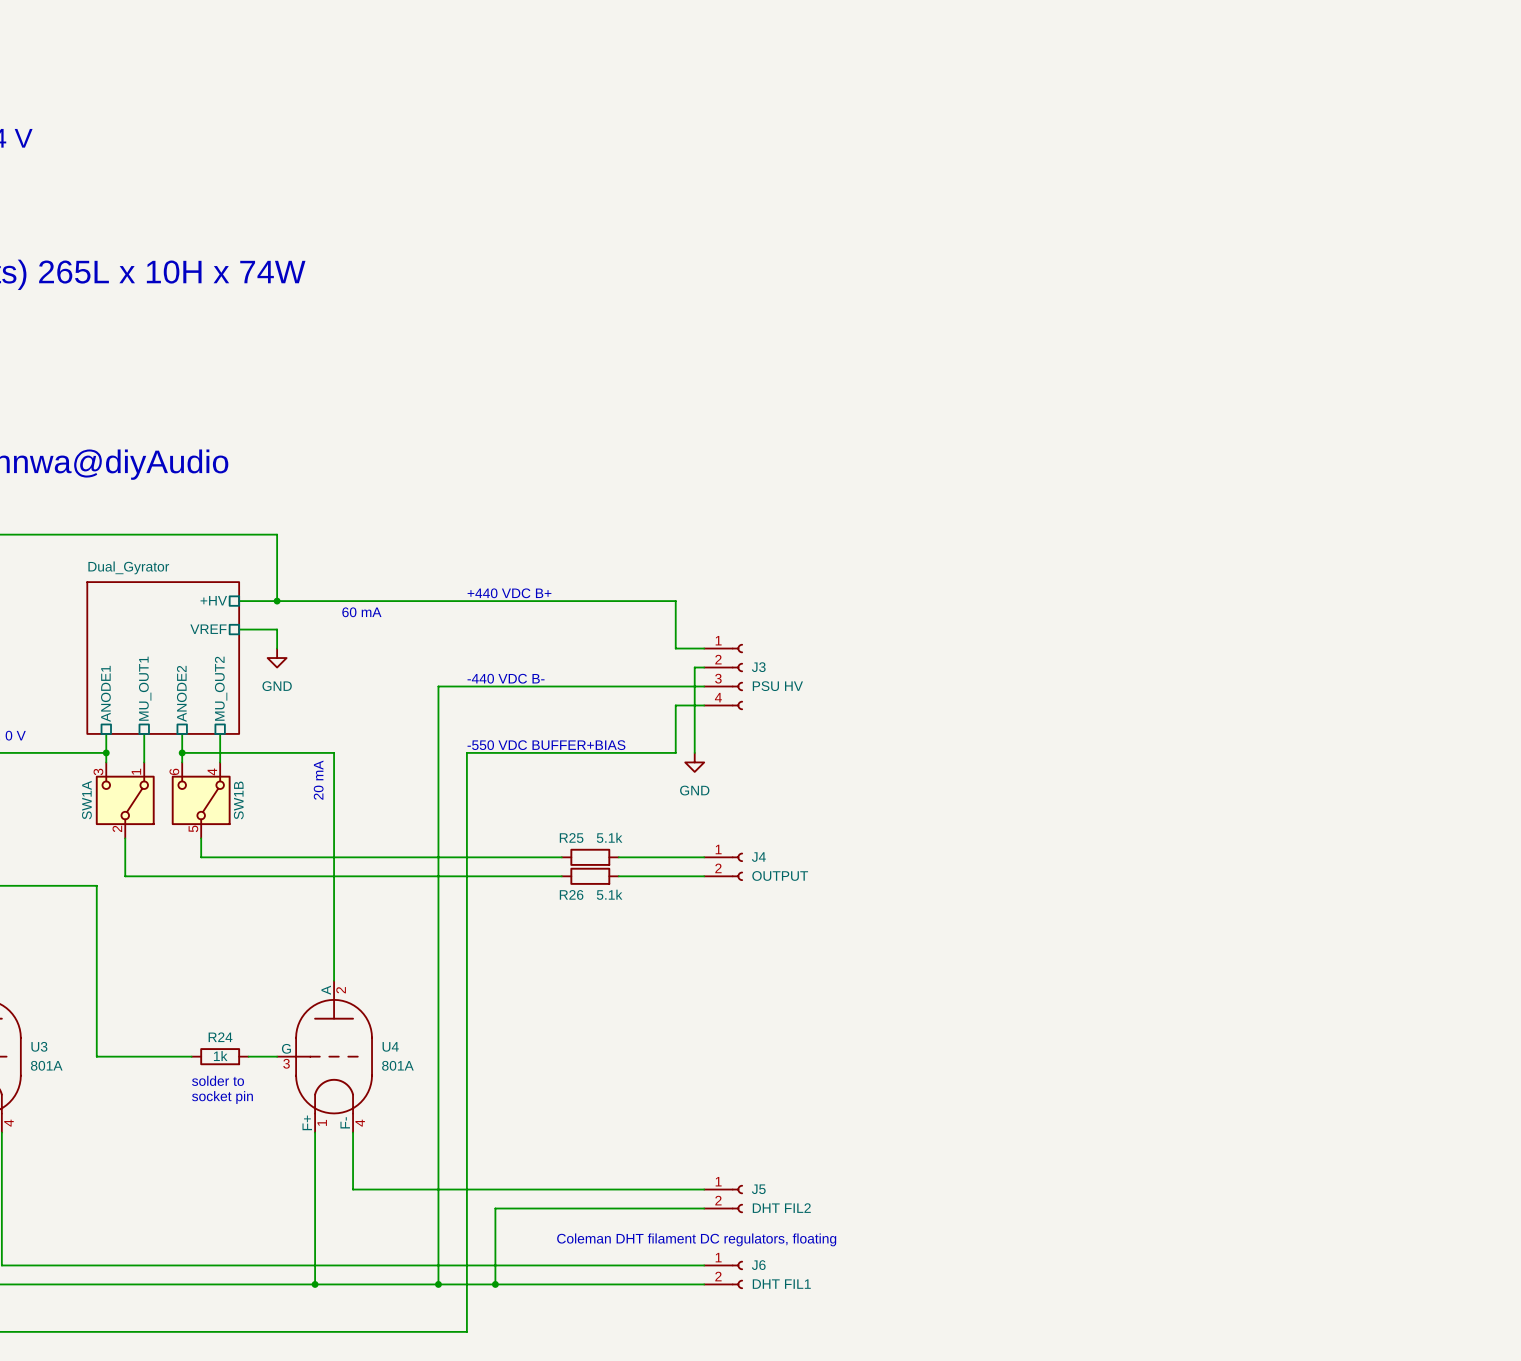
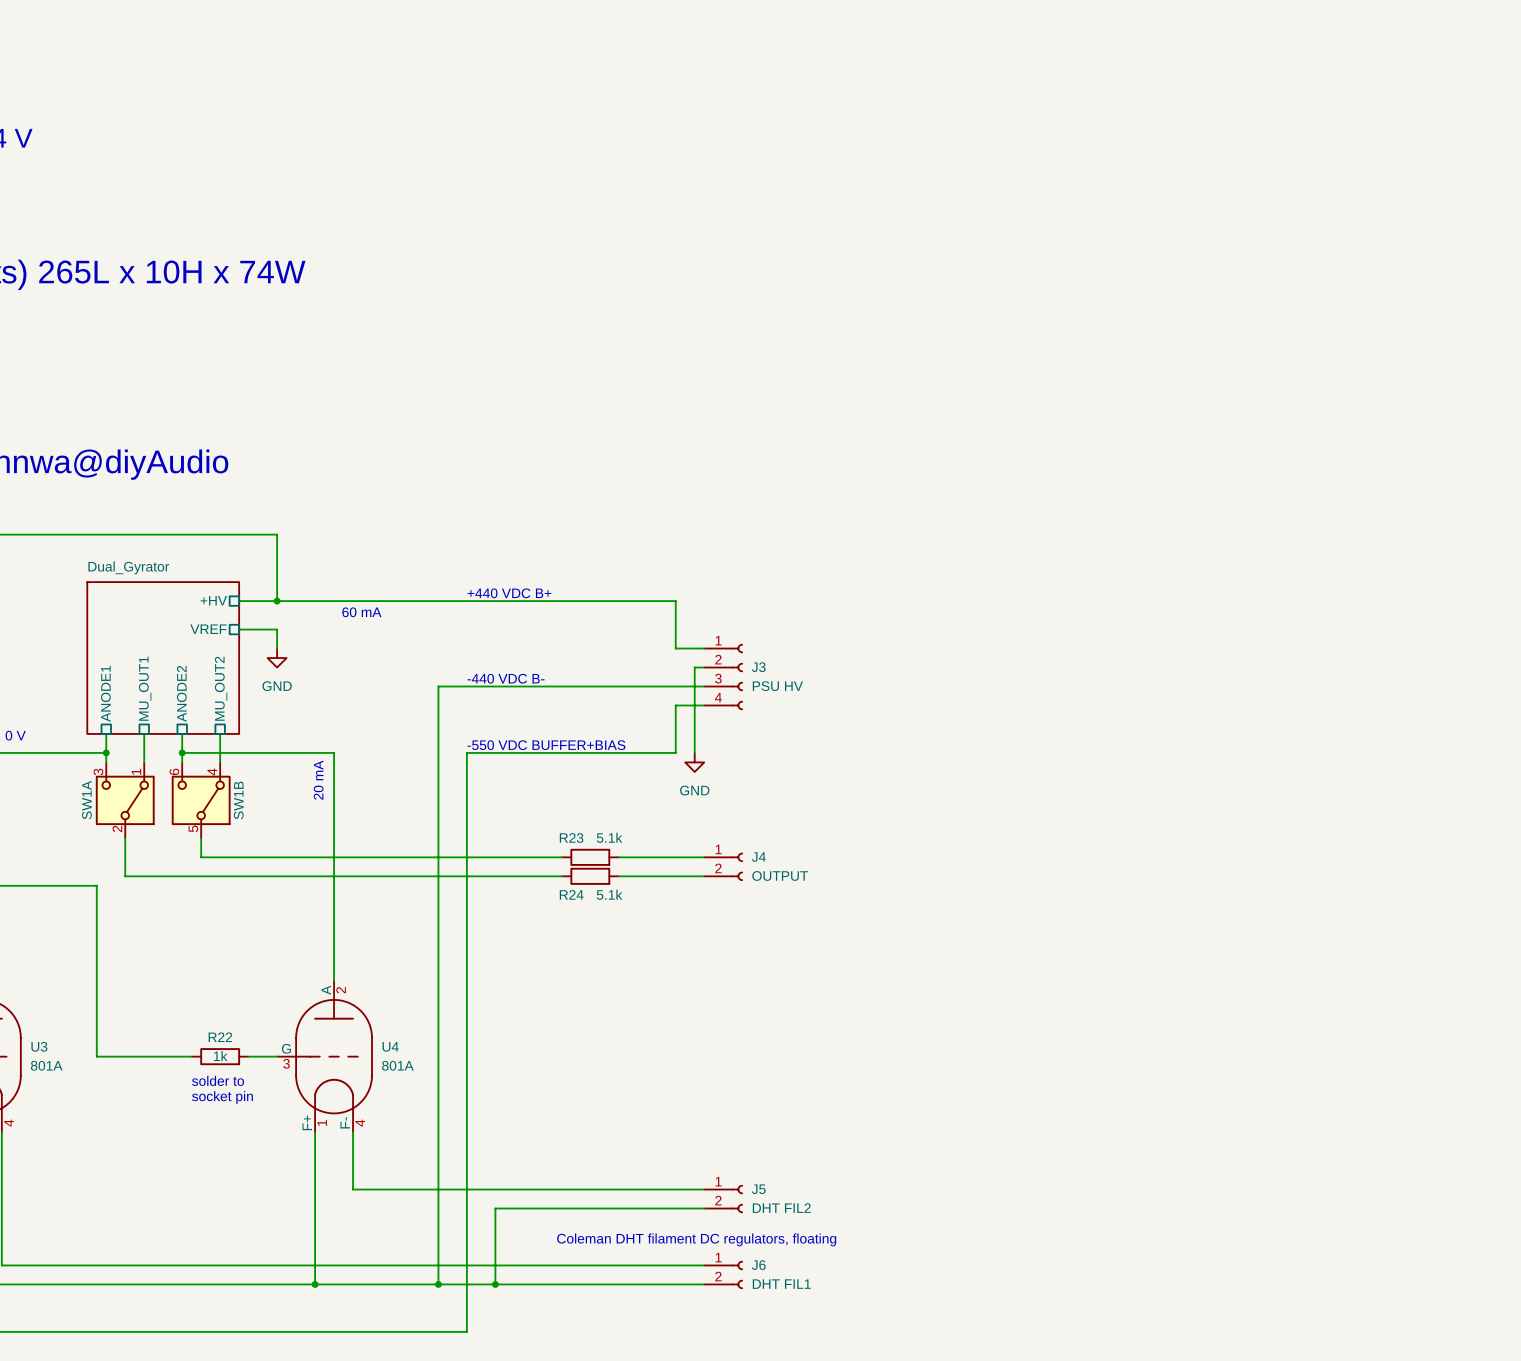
R25 name: R25 (571, 838) -> R23 (571, 838)
R26 name: R26 (571, 894) -> R24 (571, 894)
R24 name: R24 (220, 1037) -> R22 (220, 1037)

